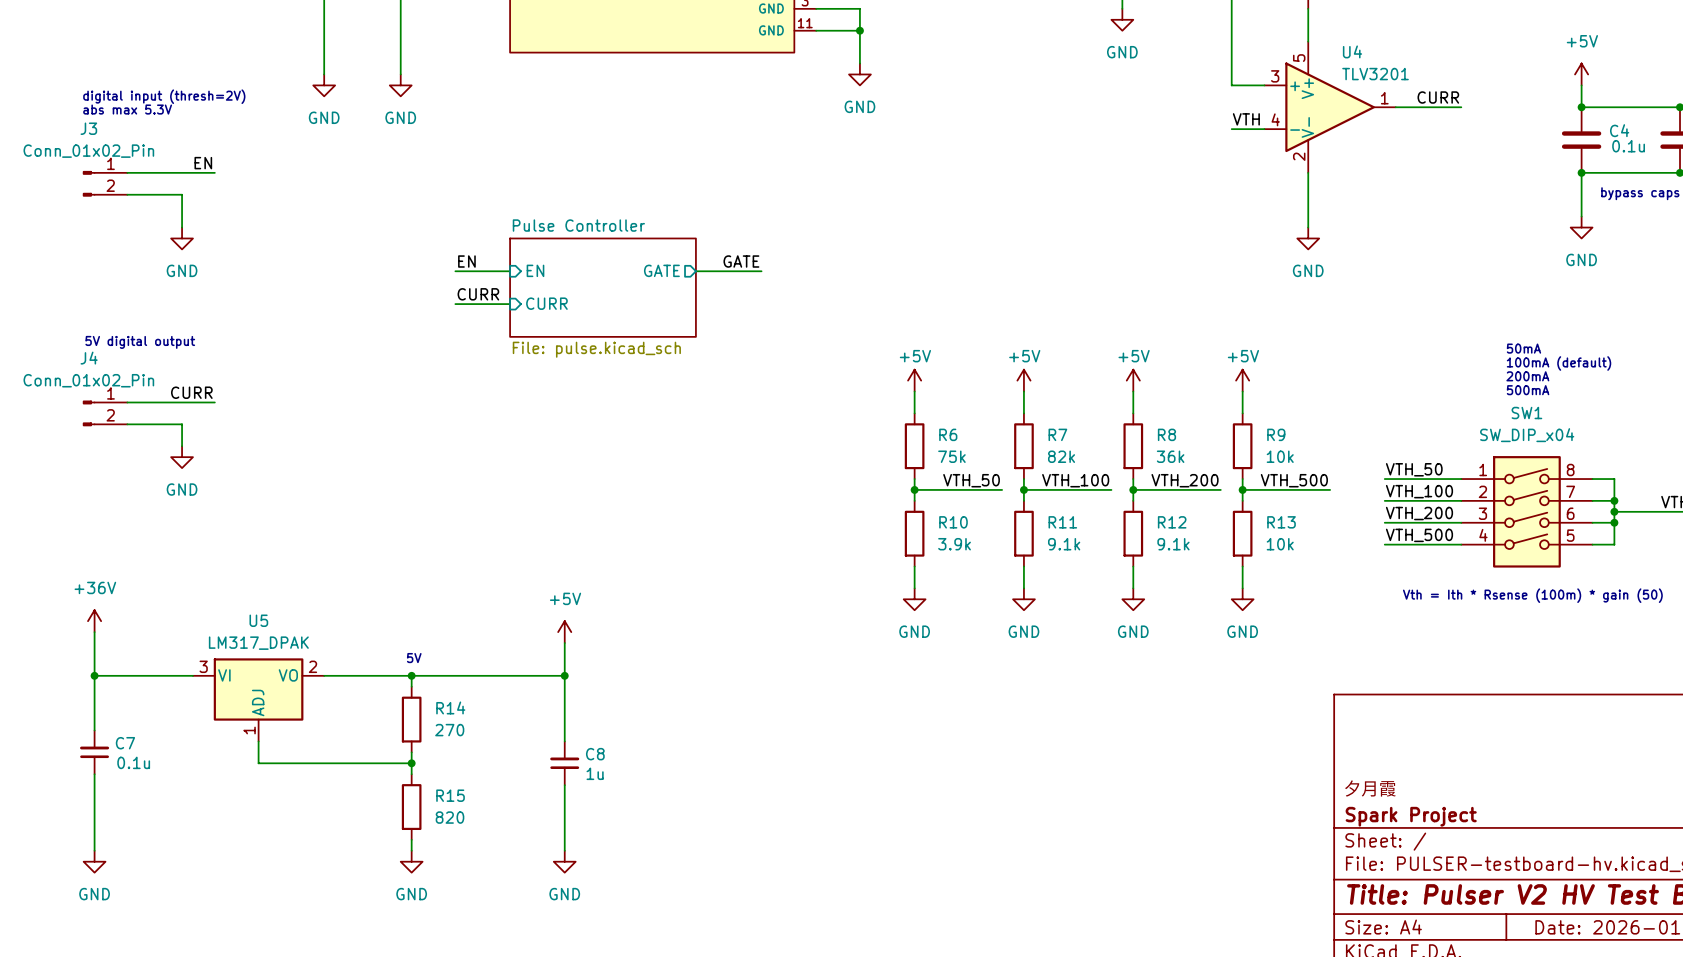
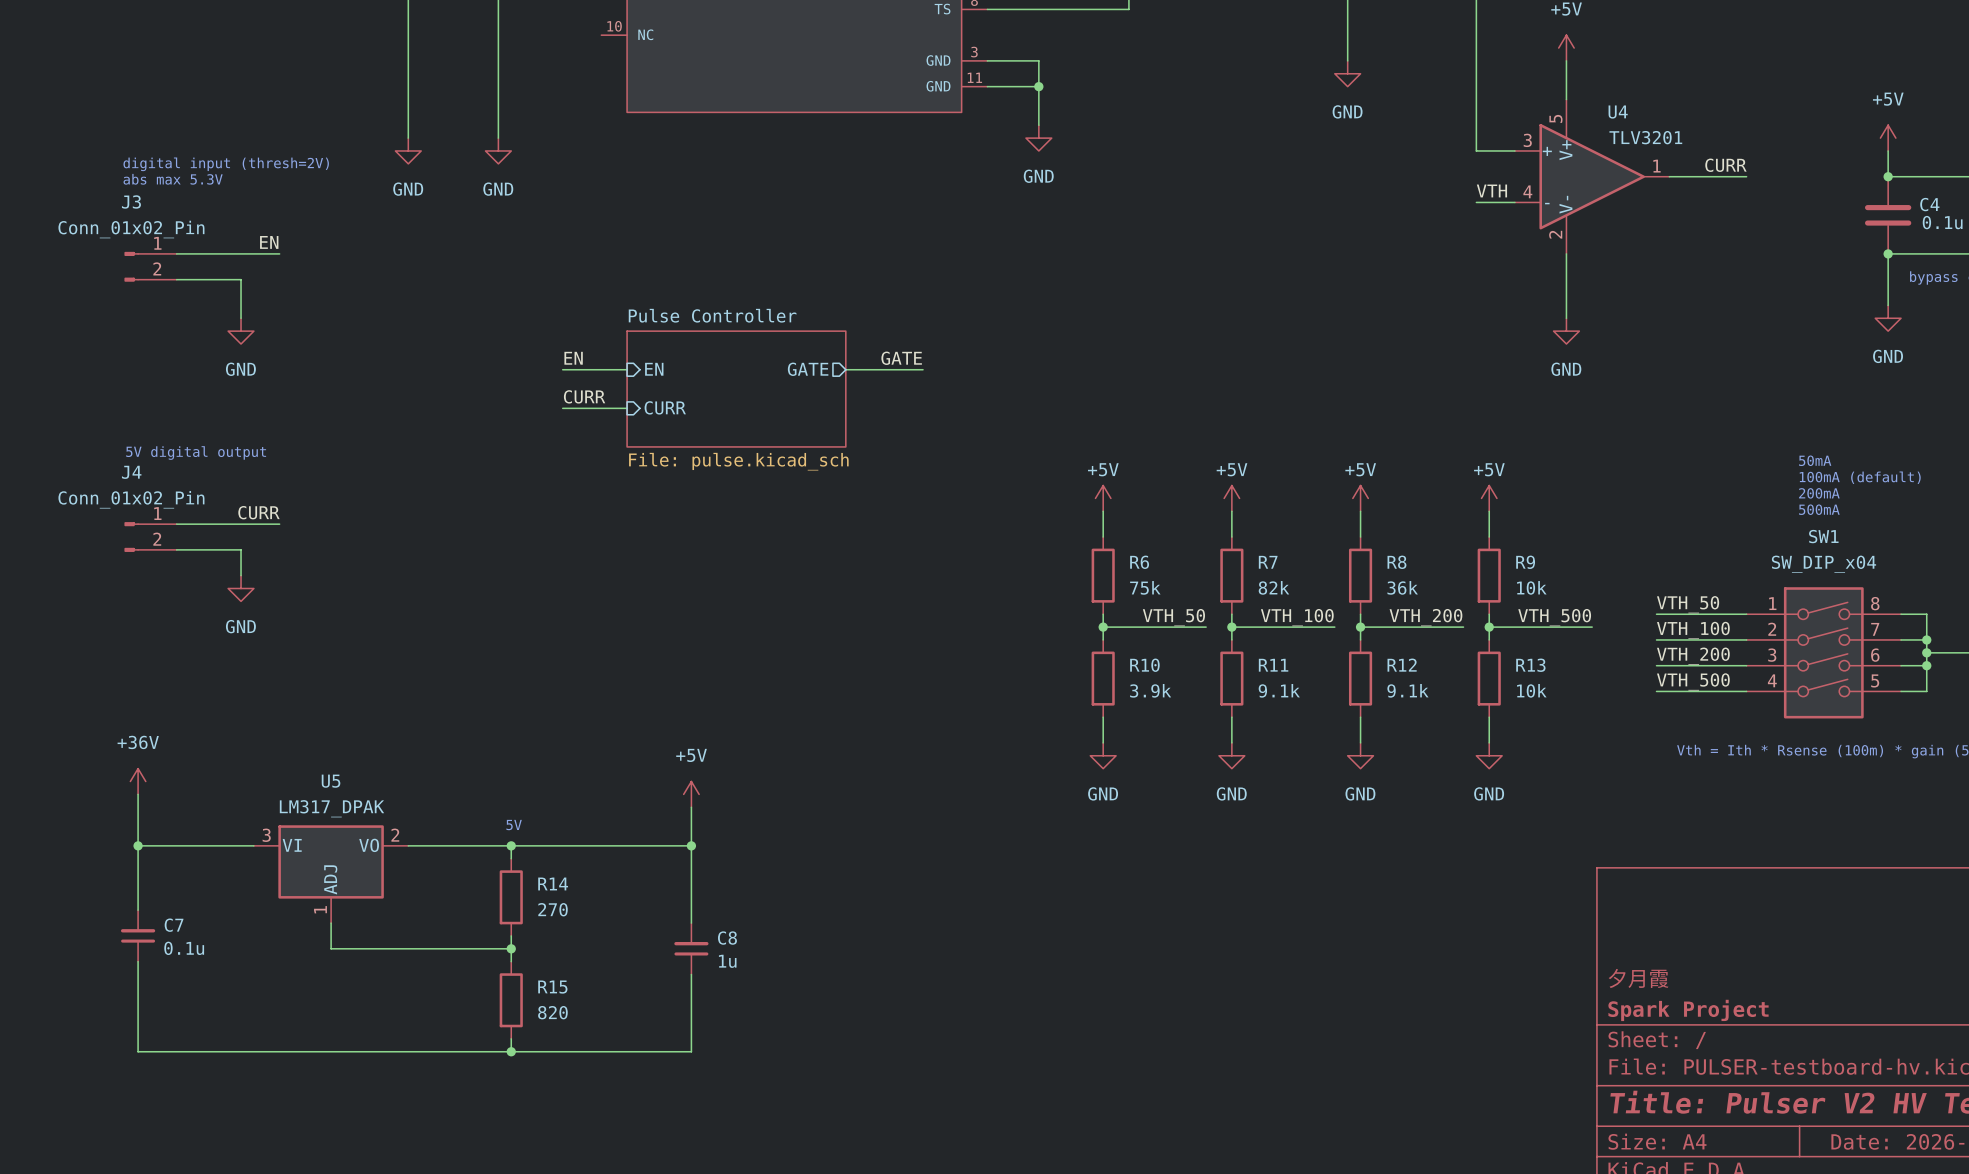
wire: none -> (138, 1051) (691, 1051)
junction: none -> (511, 1051)
power symbol: GND (94, 861) -> none
power symbol: GND (411, 861) -> none
power symbol: GND (564, 861) -> none

